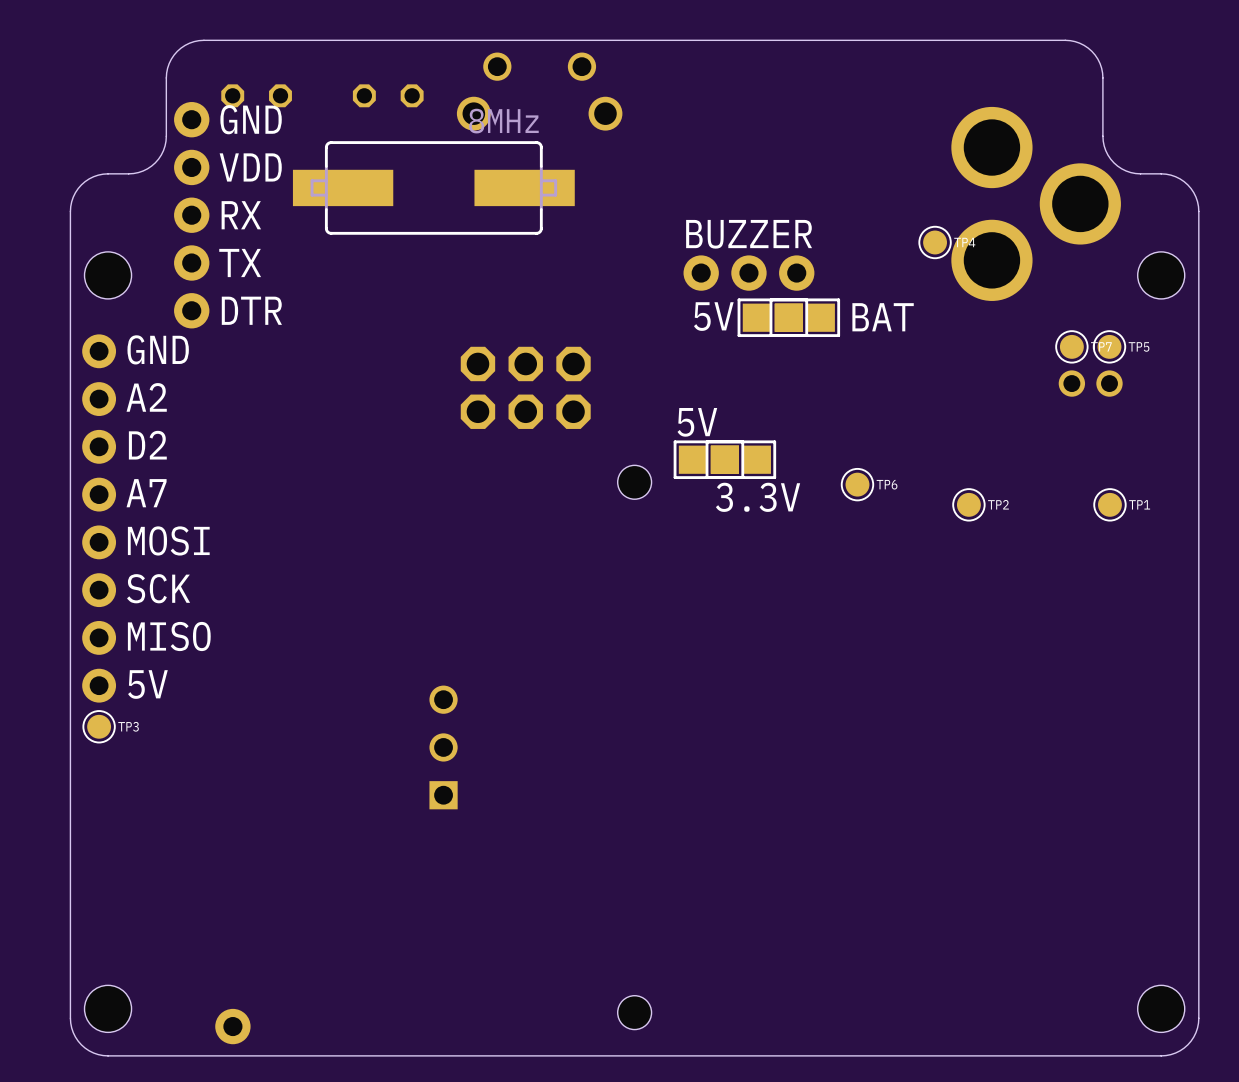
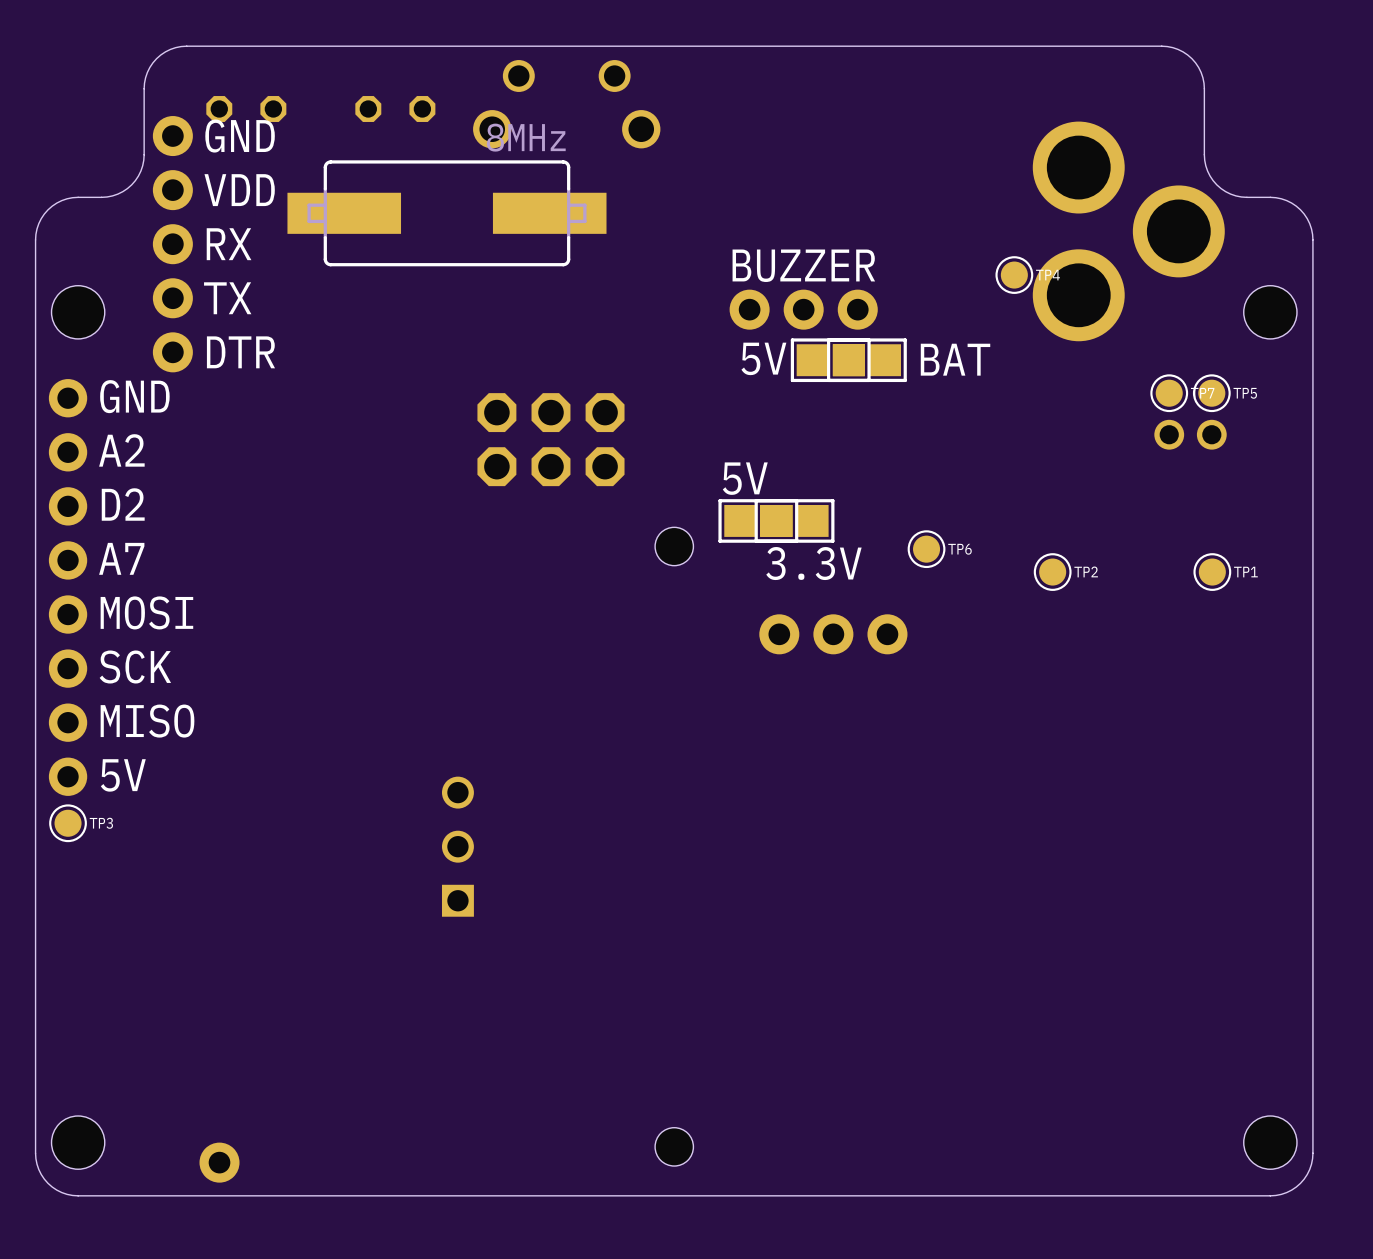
part: none -> (833, 634)

